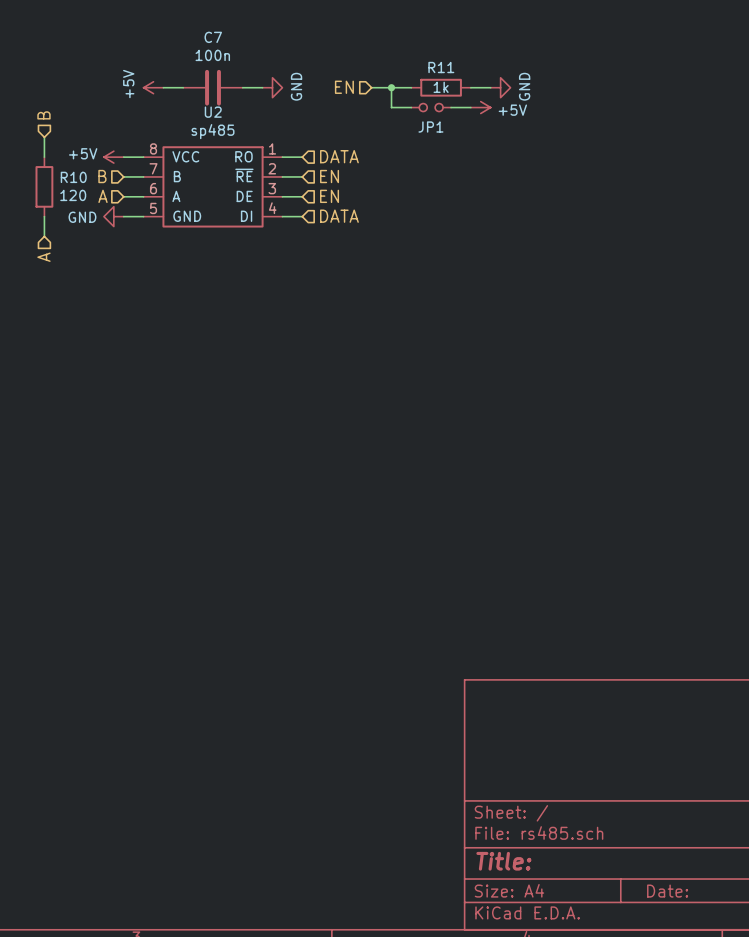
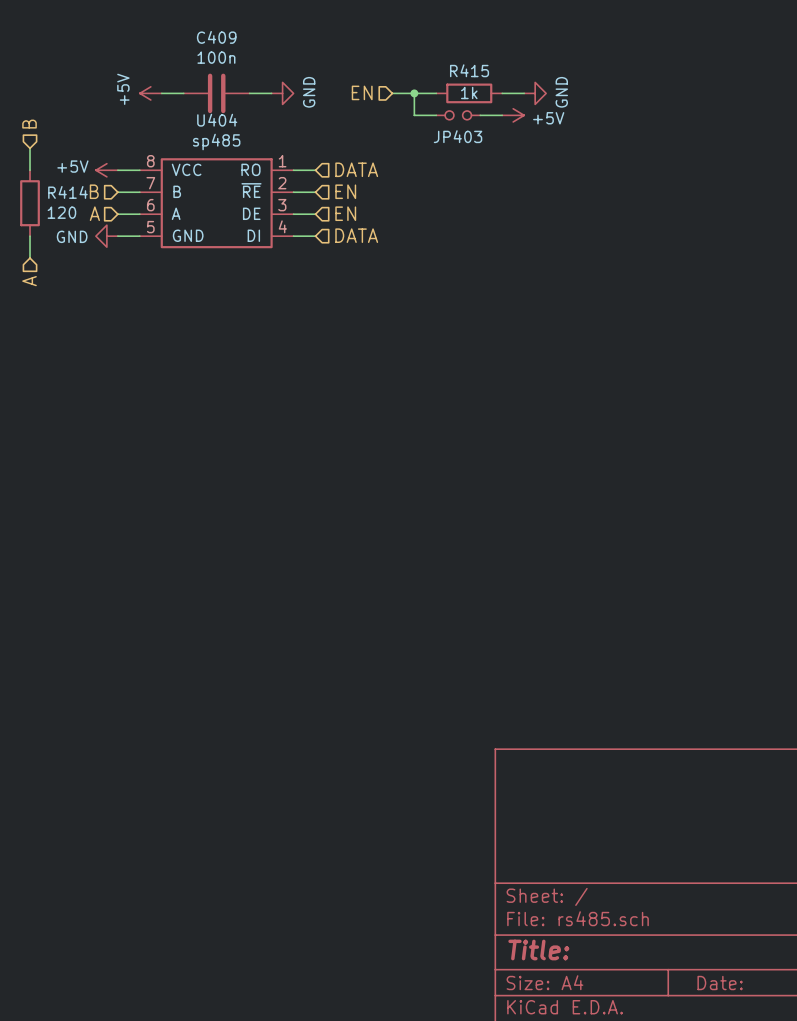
C7 name: C7 (213, 37) -> C409 (216, 37)
R11 name: R11 (441, 67) -> R415 (469, 70)
U2 name: U2 (213, 112) -> U404 (217, 120)
JP1 name: JP1 (430, 127) -> JP403 (458, 136)
R10 name: R10 (73, 177) -> R414 (67, 192)

